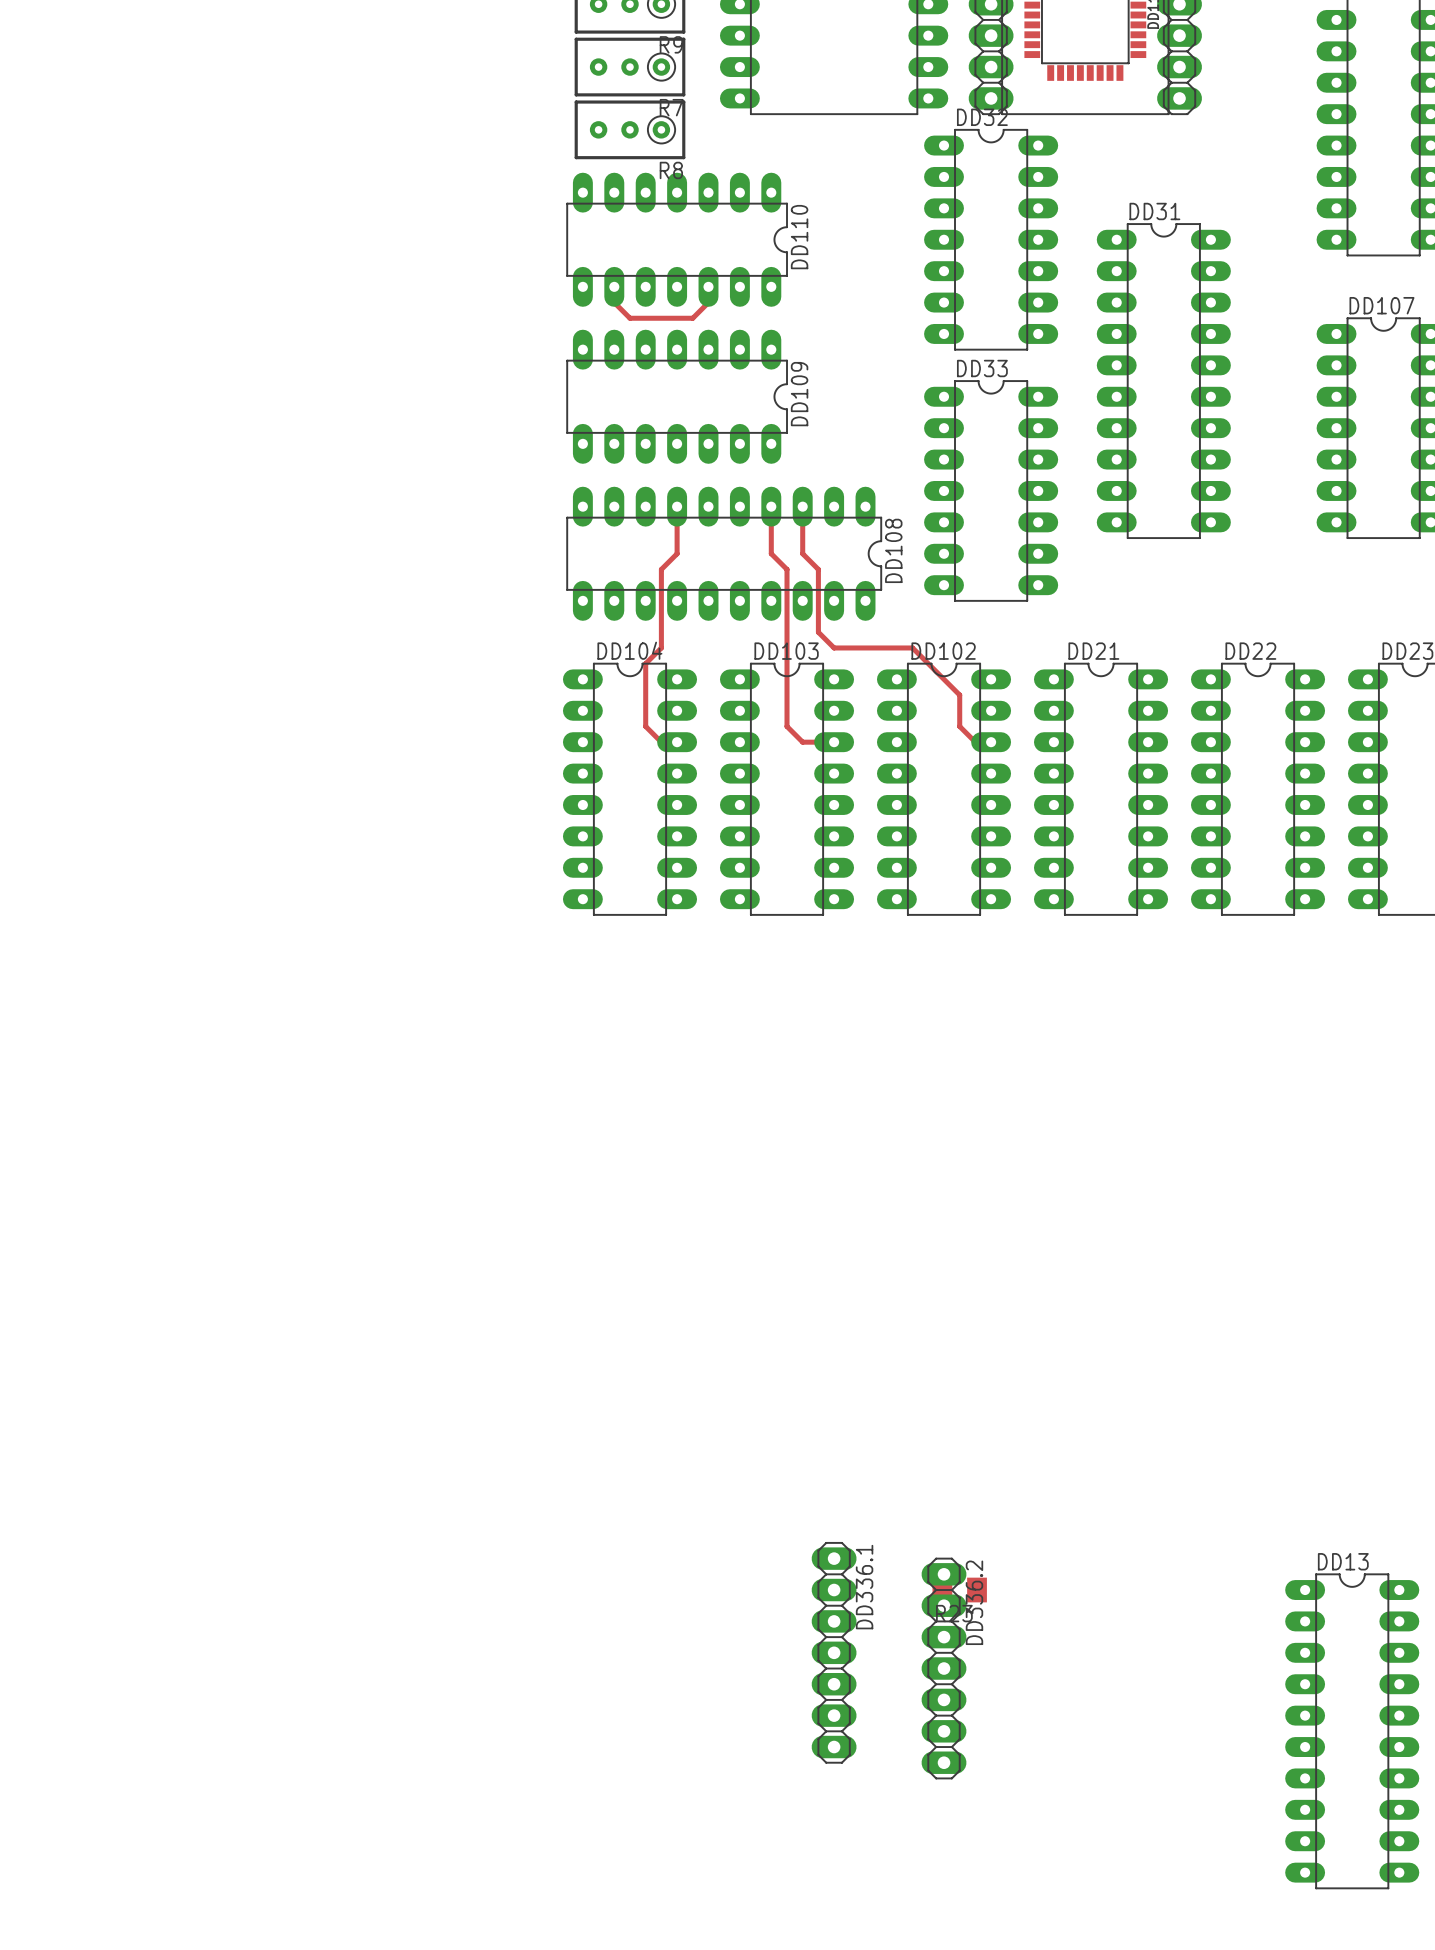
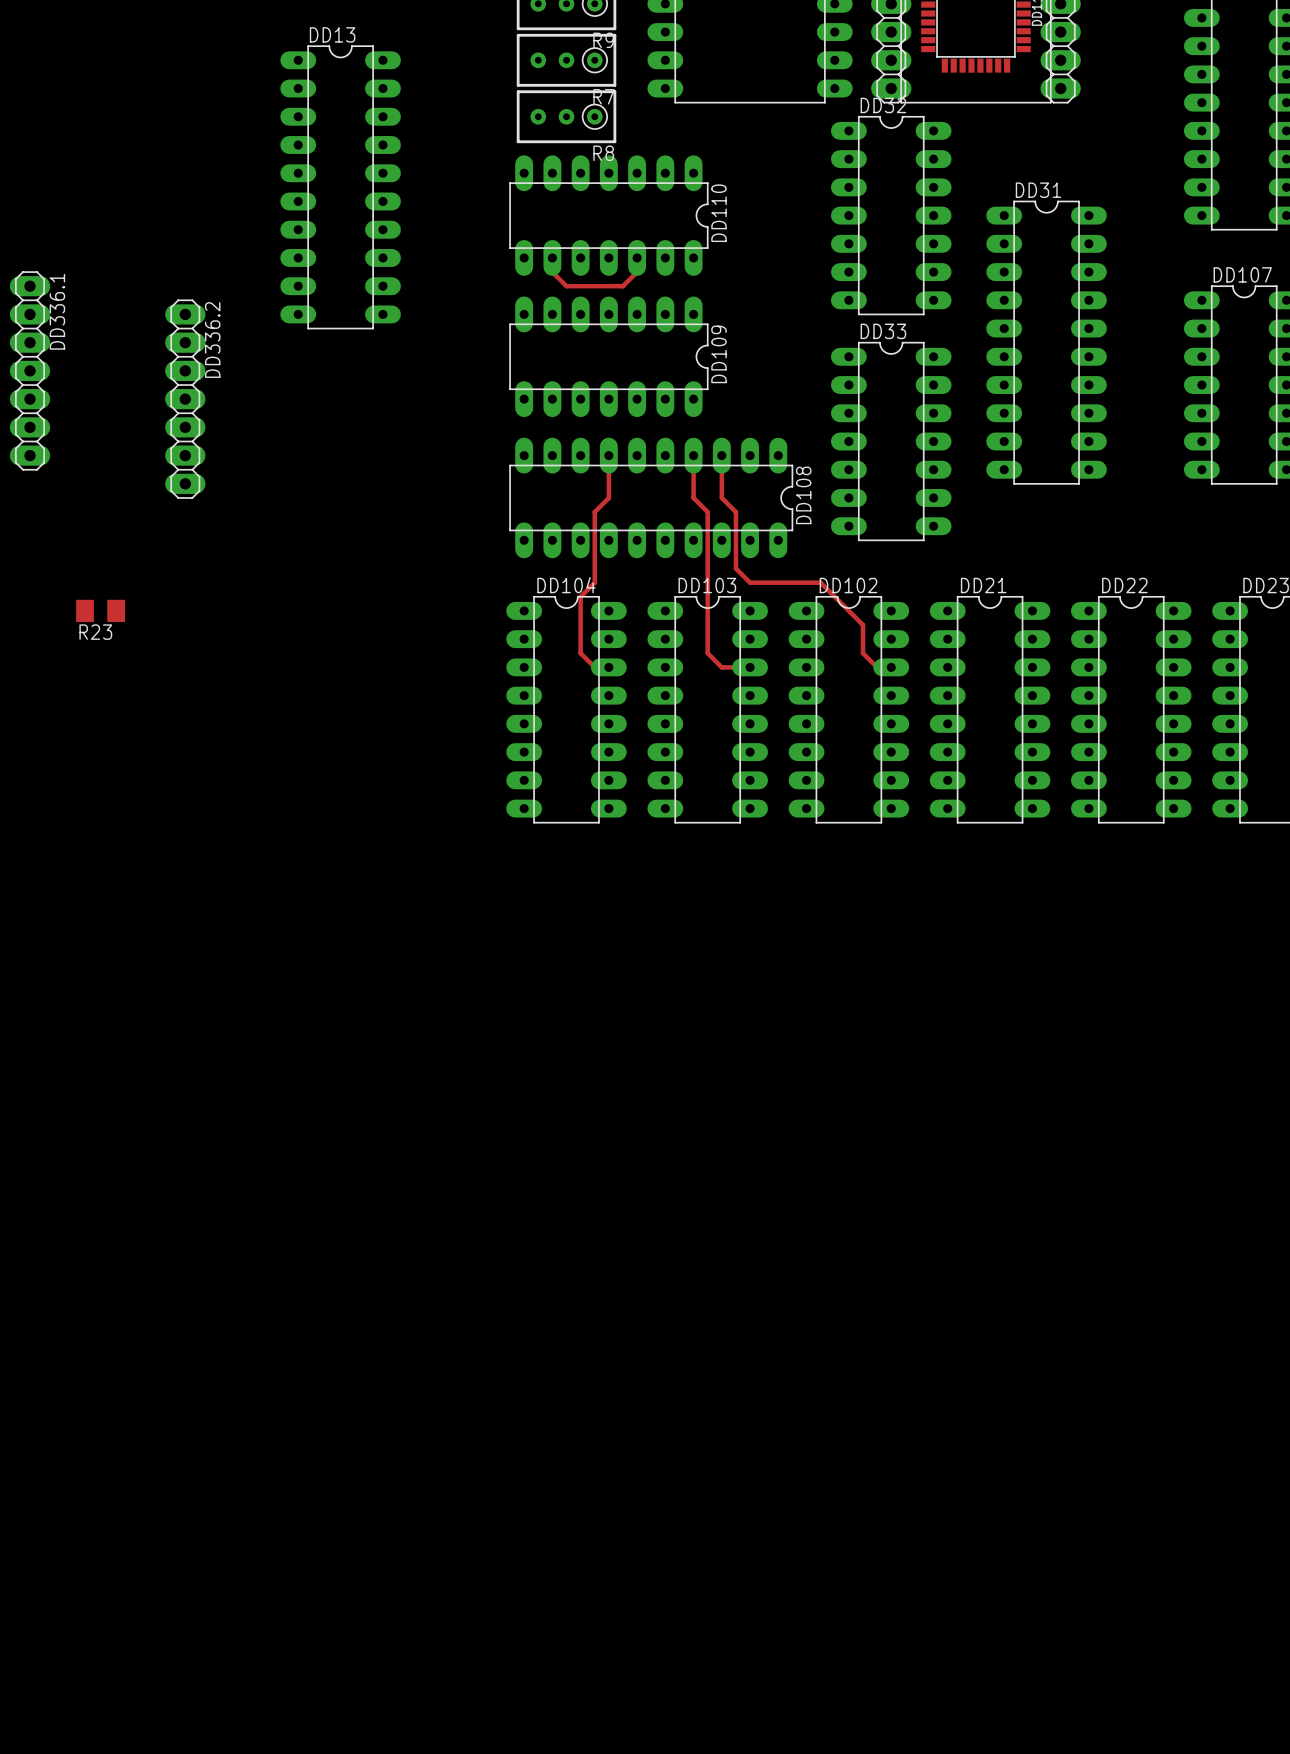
R23 position: (959, 1590) -> (100, 610)
DD336.1 position: (834, 1652) -> (30, 370)
DD336.2 position: (944, 1668) -> (185, 399)
DD13 position: (1352, 1731) -> (340, 187)

